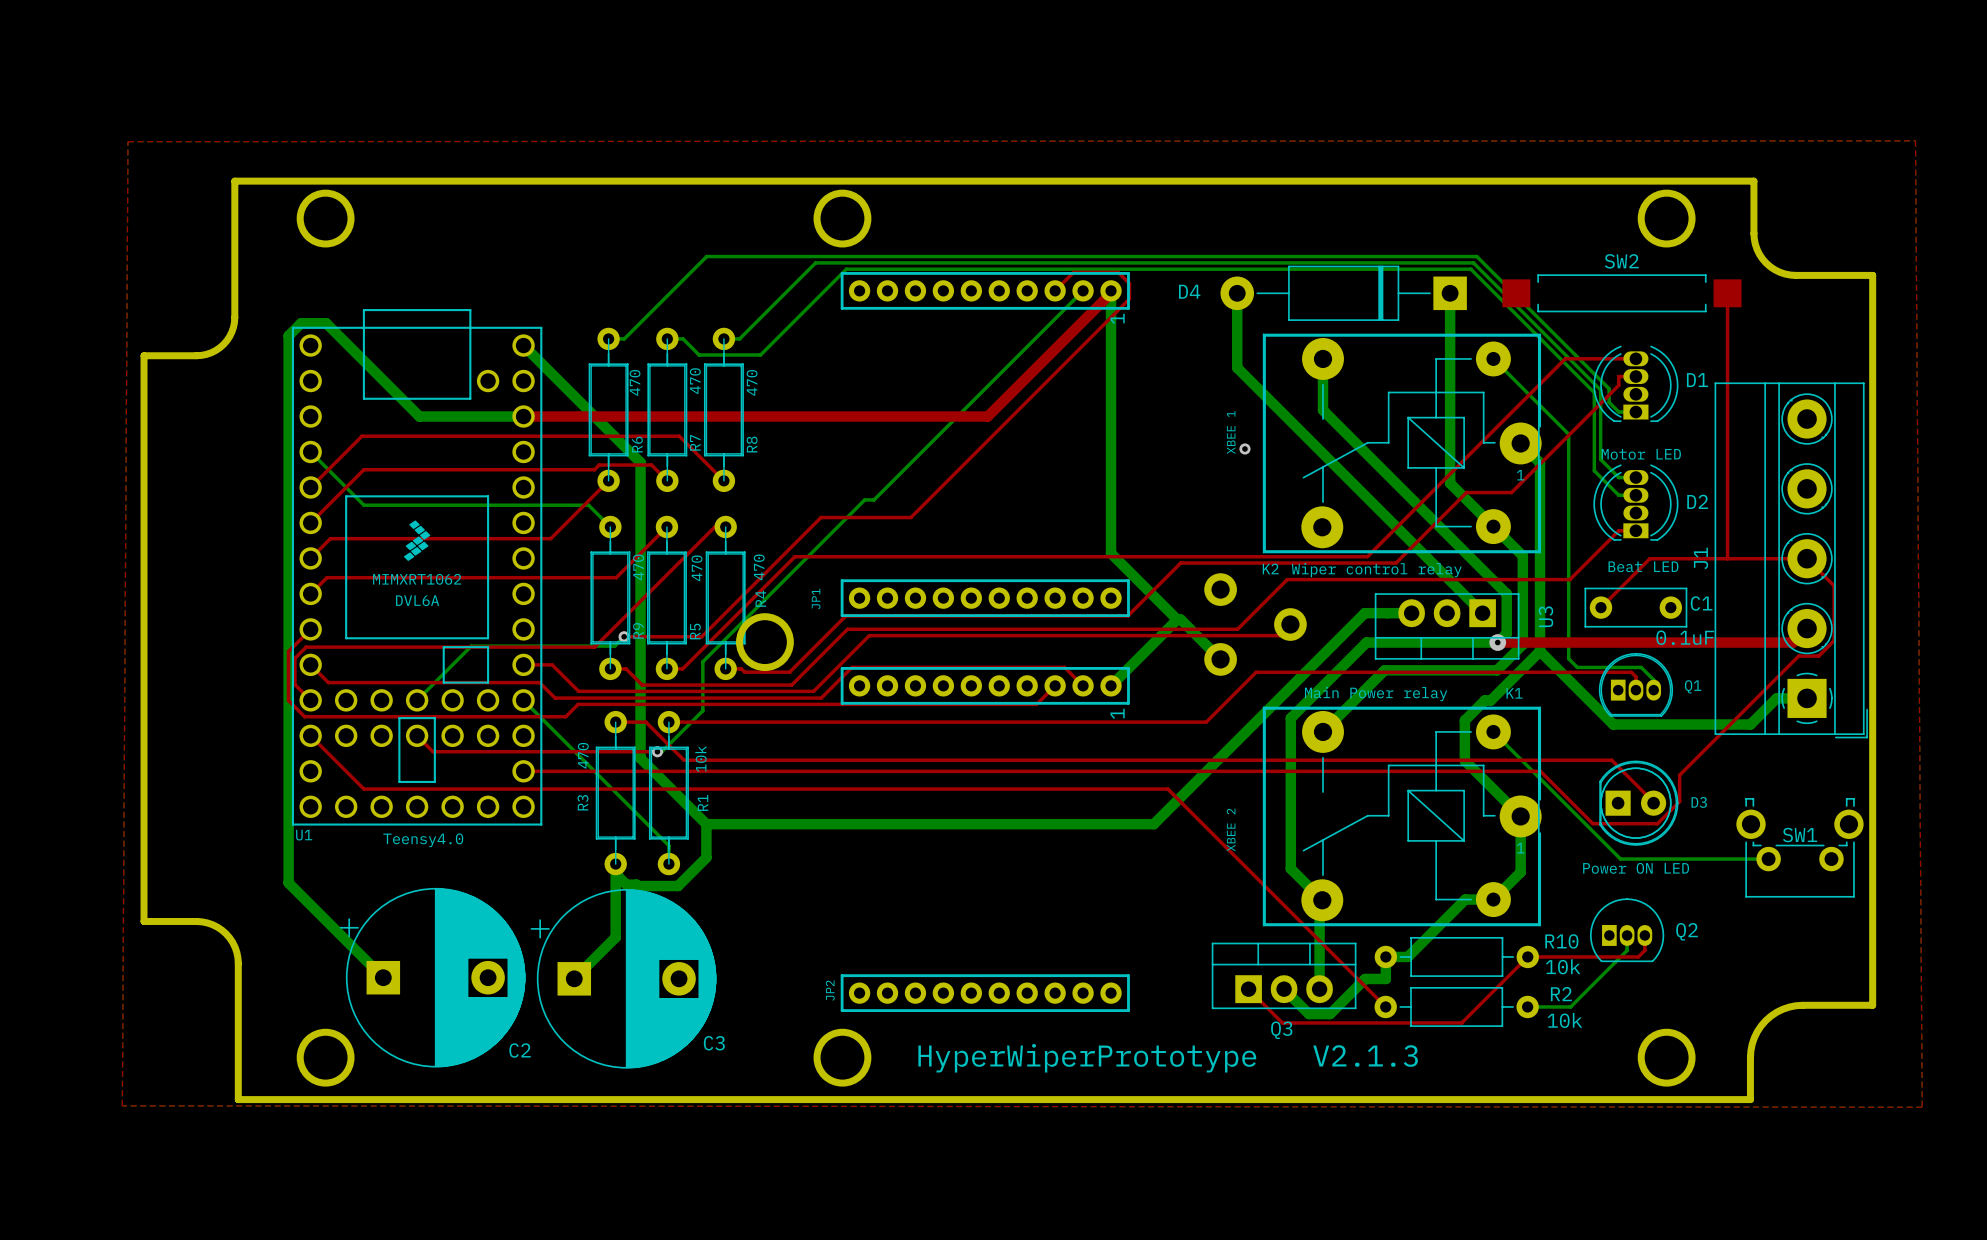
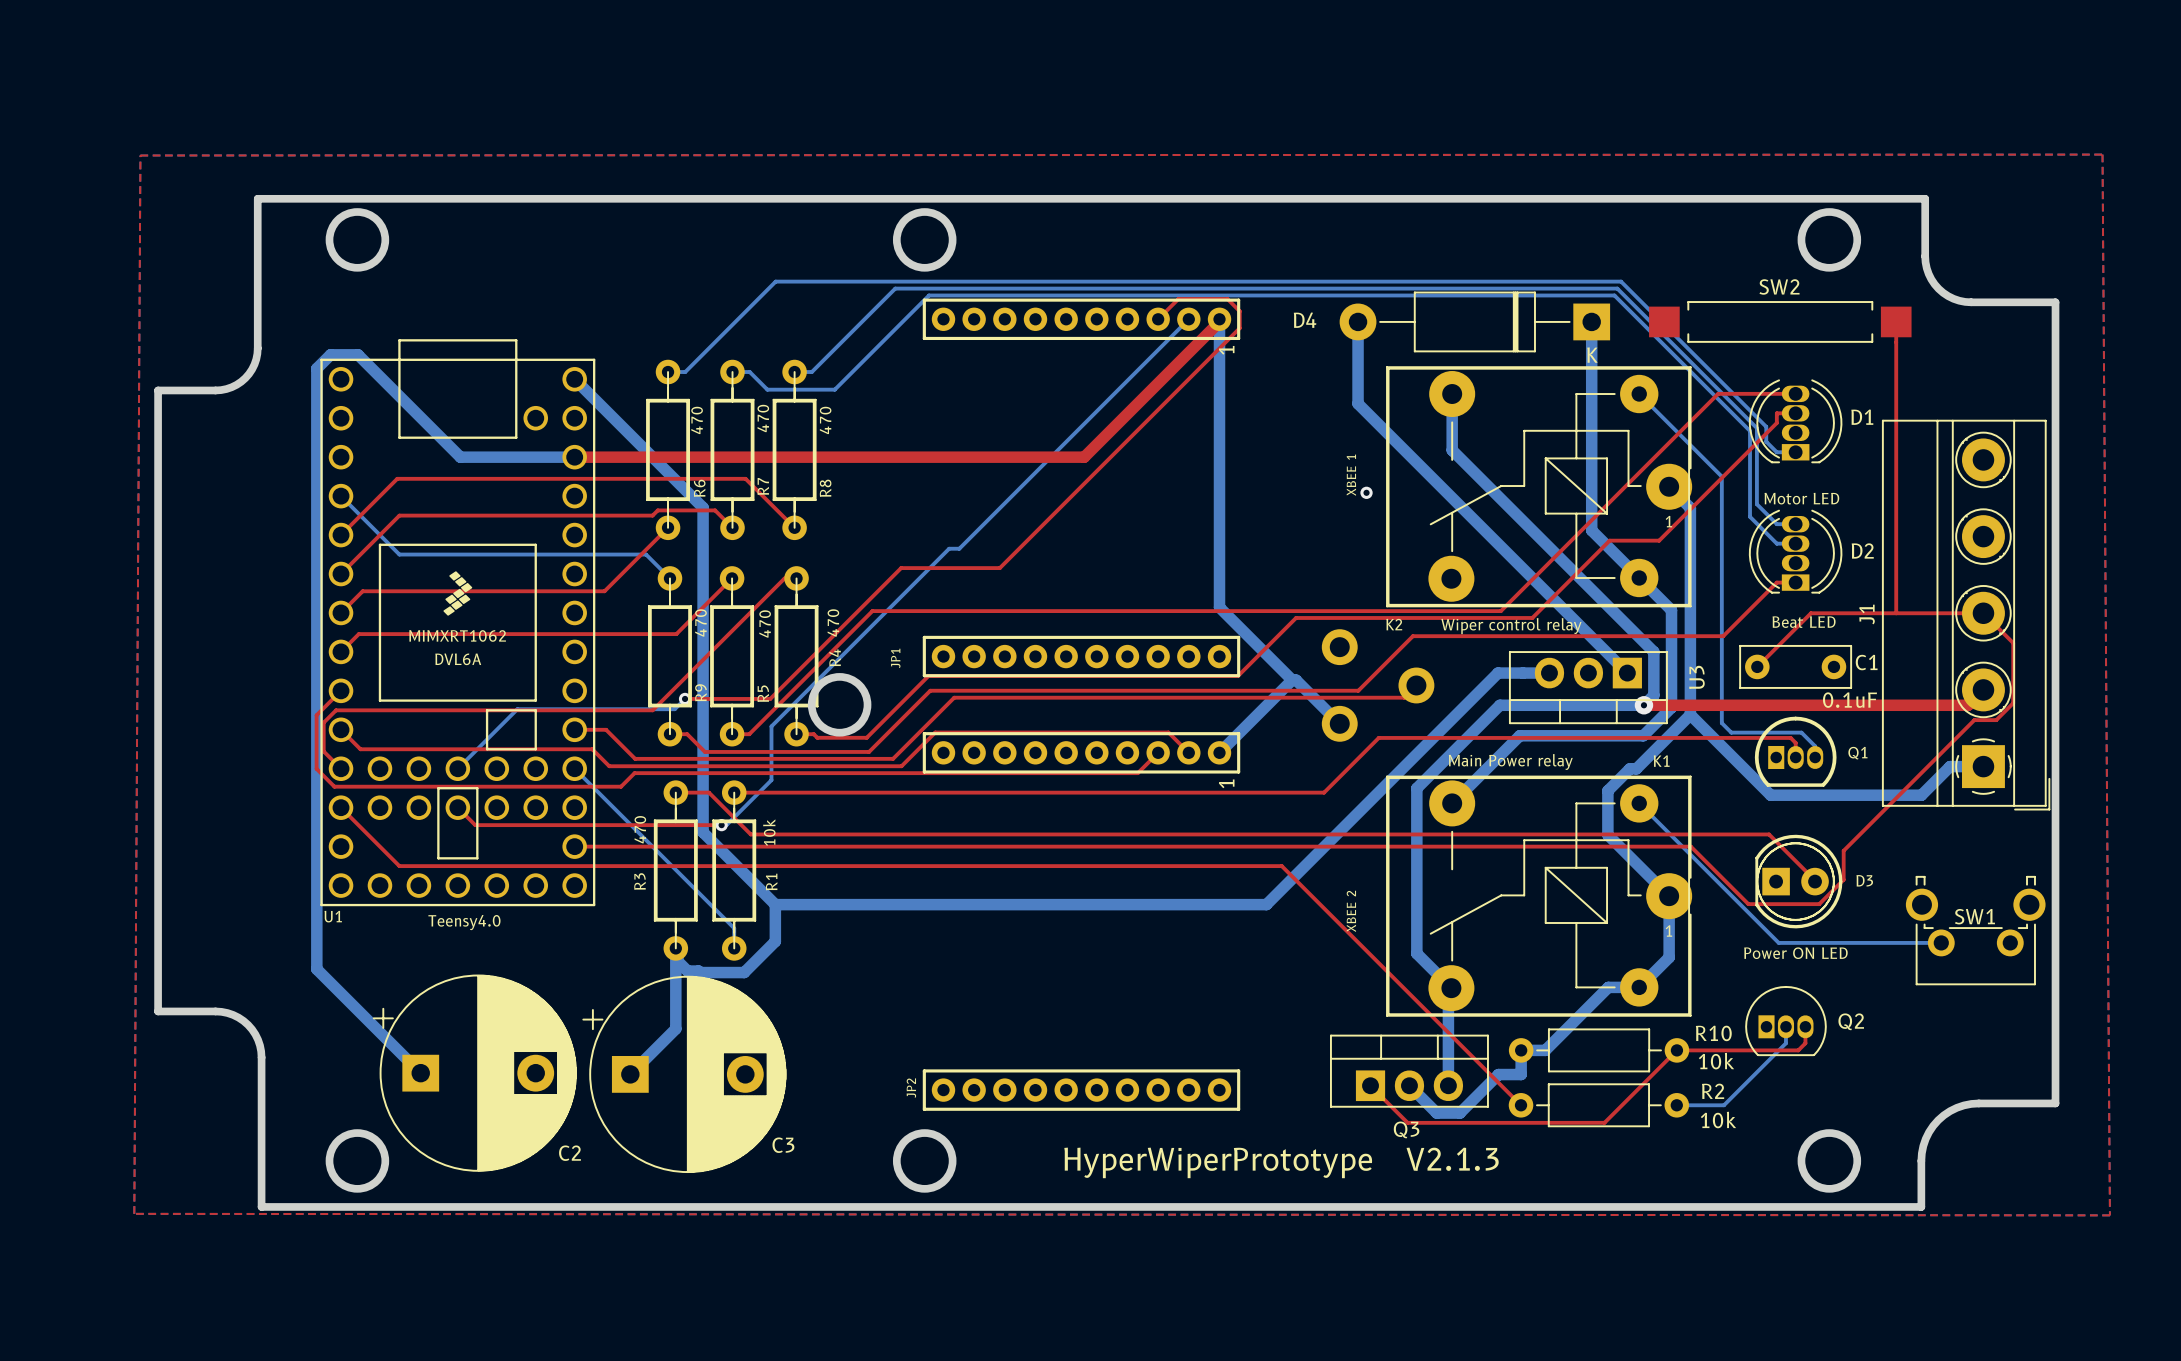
D4 text: none -> K (1592, 355)

